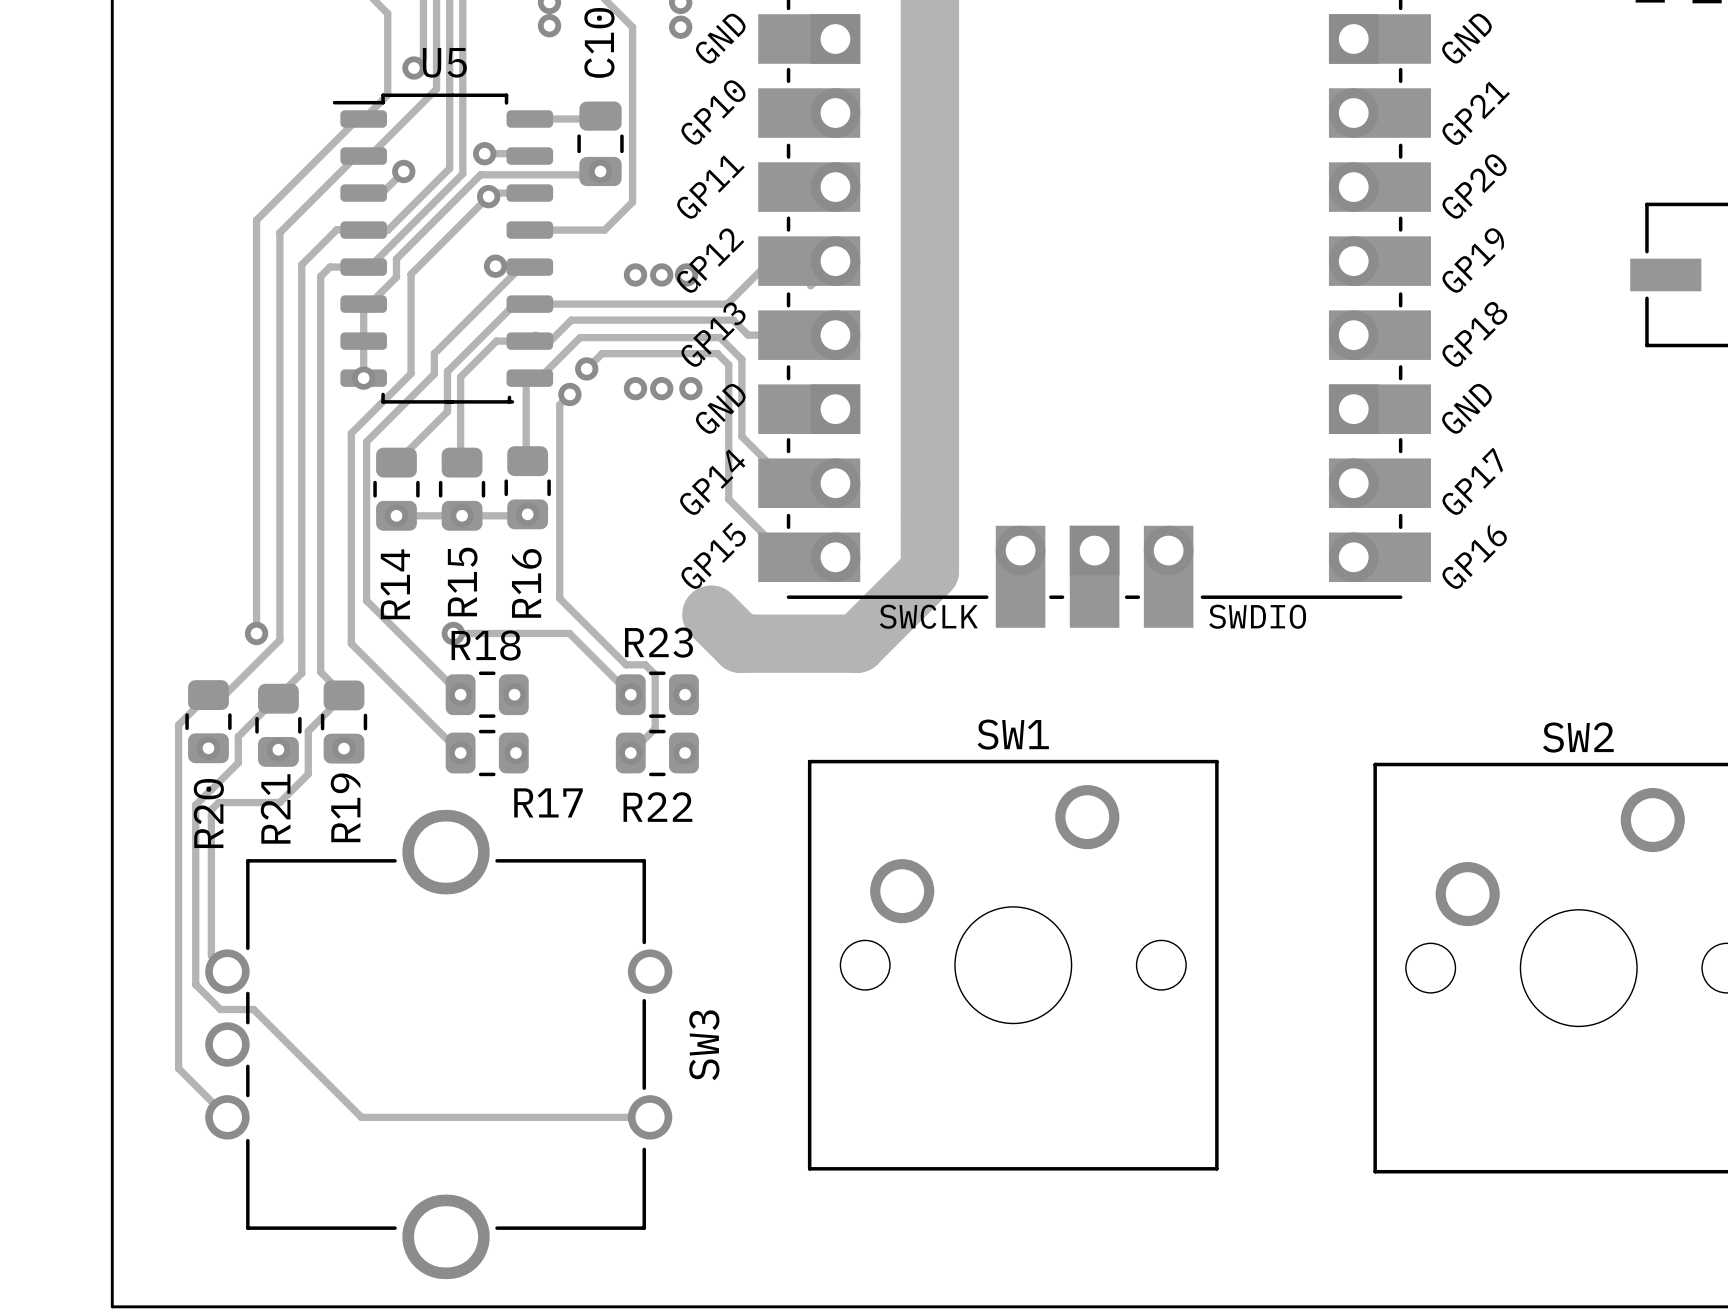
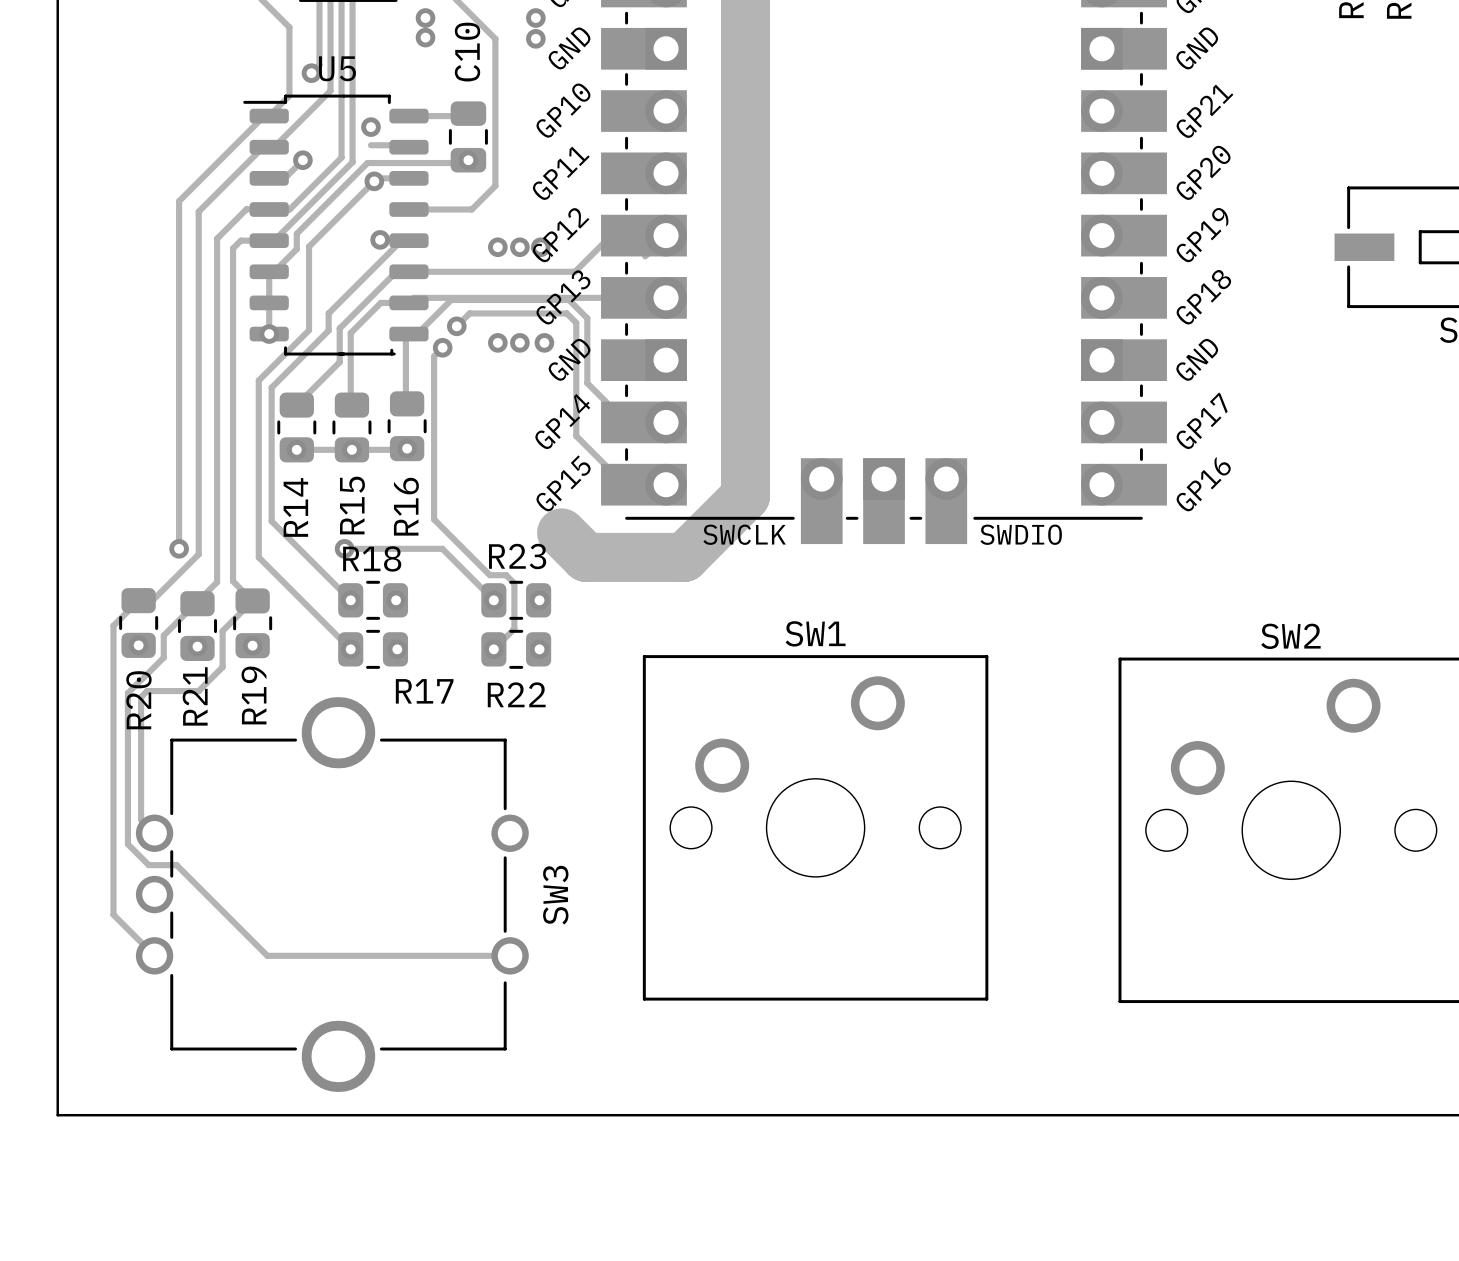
via position: (484, 153) -> (370, 127)
track: (748, 335) (733, 320) (571, 320) (550, 341) (529, 341) -> (592, 297) (413, 297)

